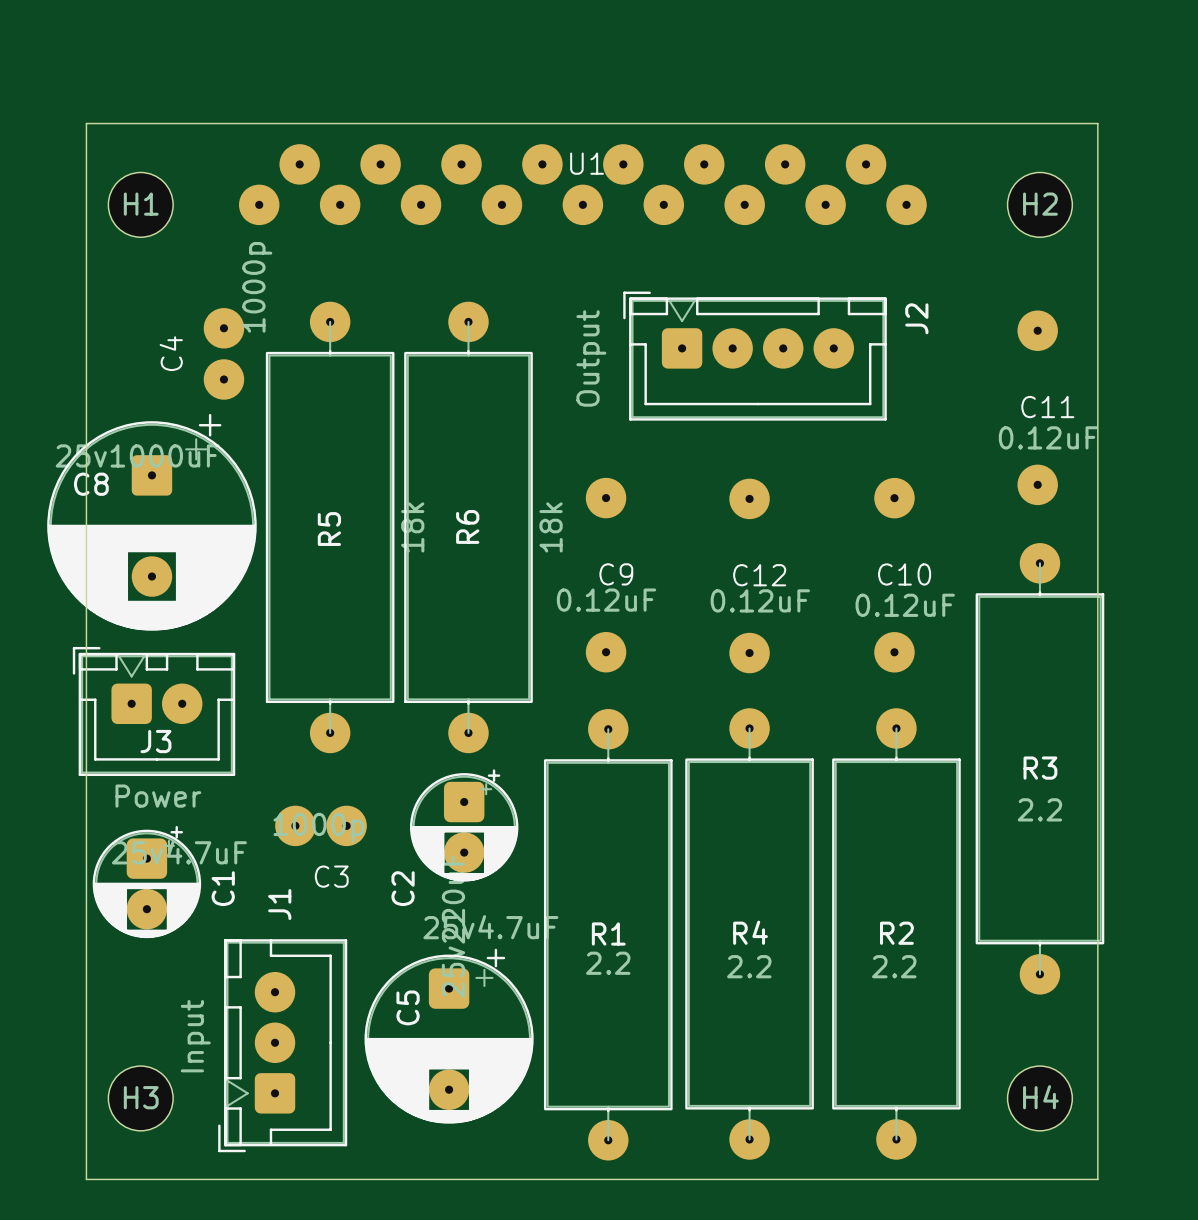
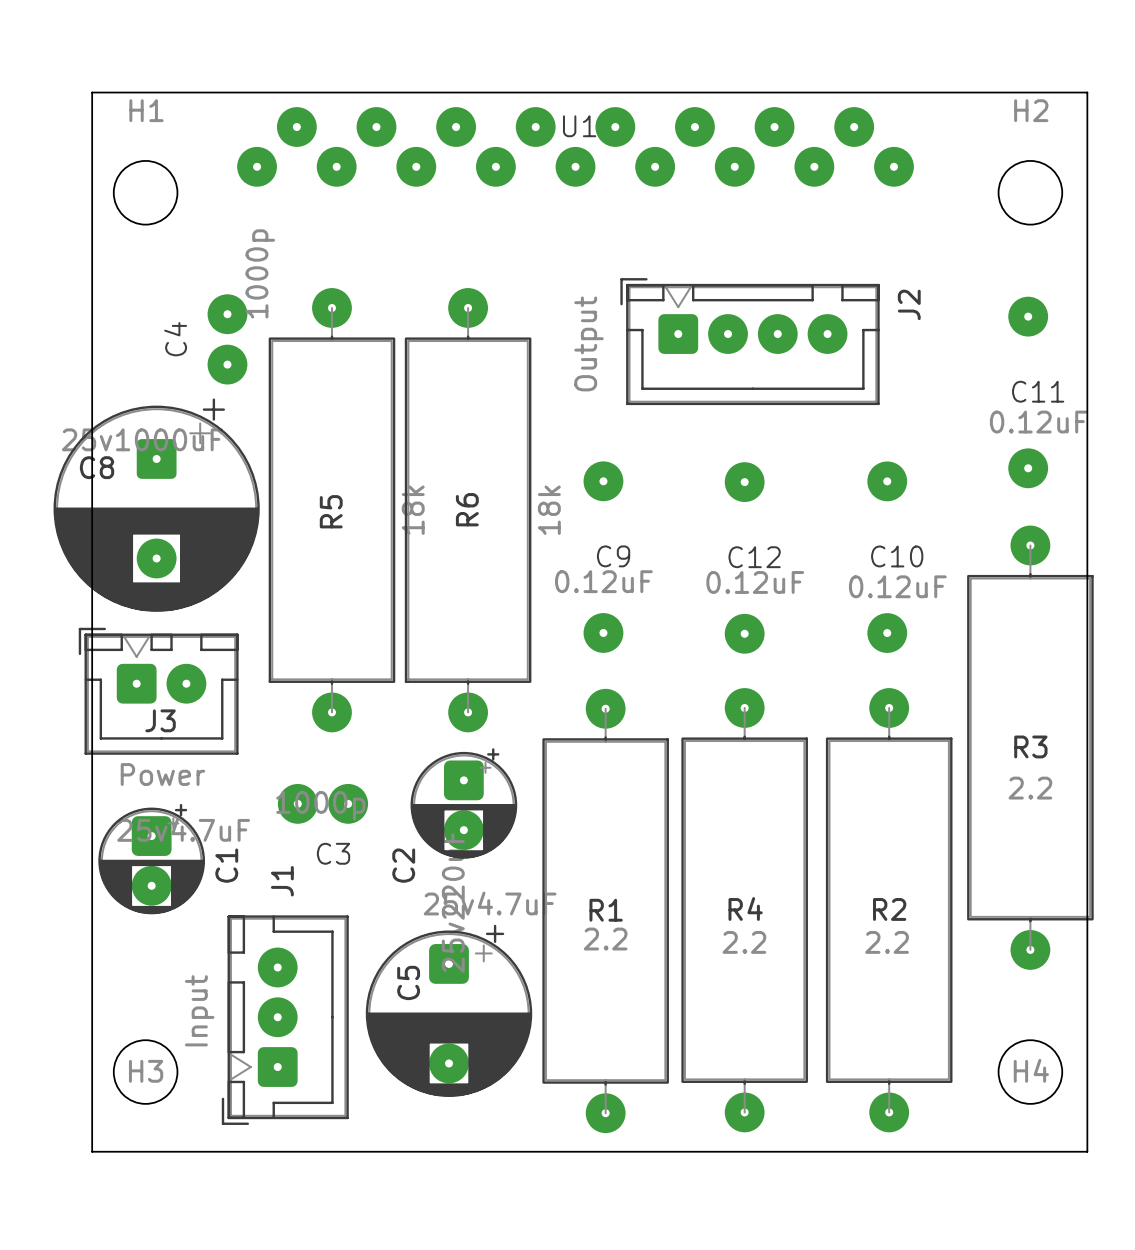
board edge: (86, 123) (1097, 123) -> (92, 112) (92, 92) (1087, 92) (1087, 112)
U1 position: (582, 184) -> (575, 146)
H1 name position: H1 (141, 204) -> H1 (146, 110)
H2 name position: H2 (1040, 204) -> H2 (1031, 110)

